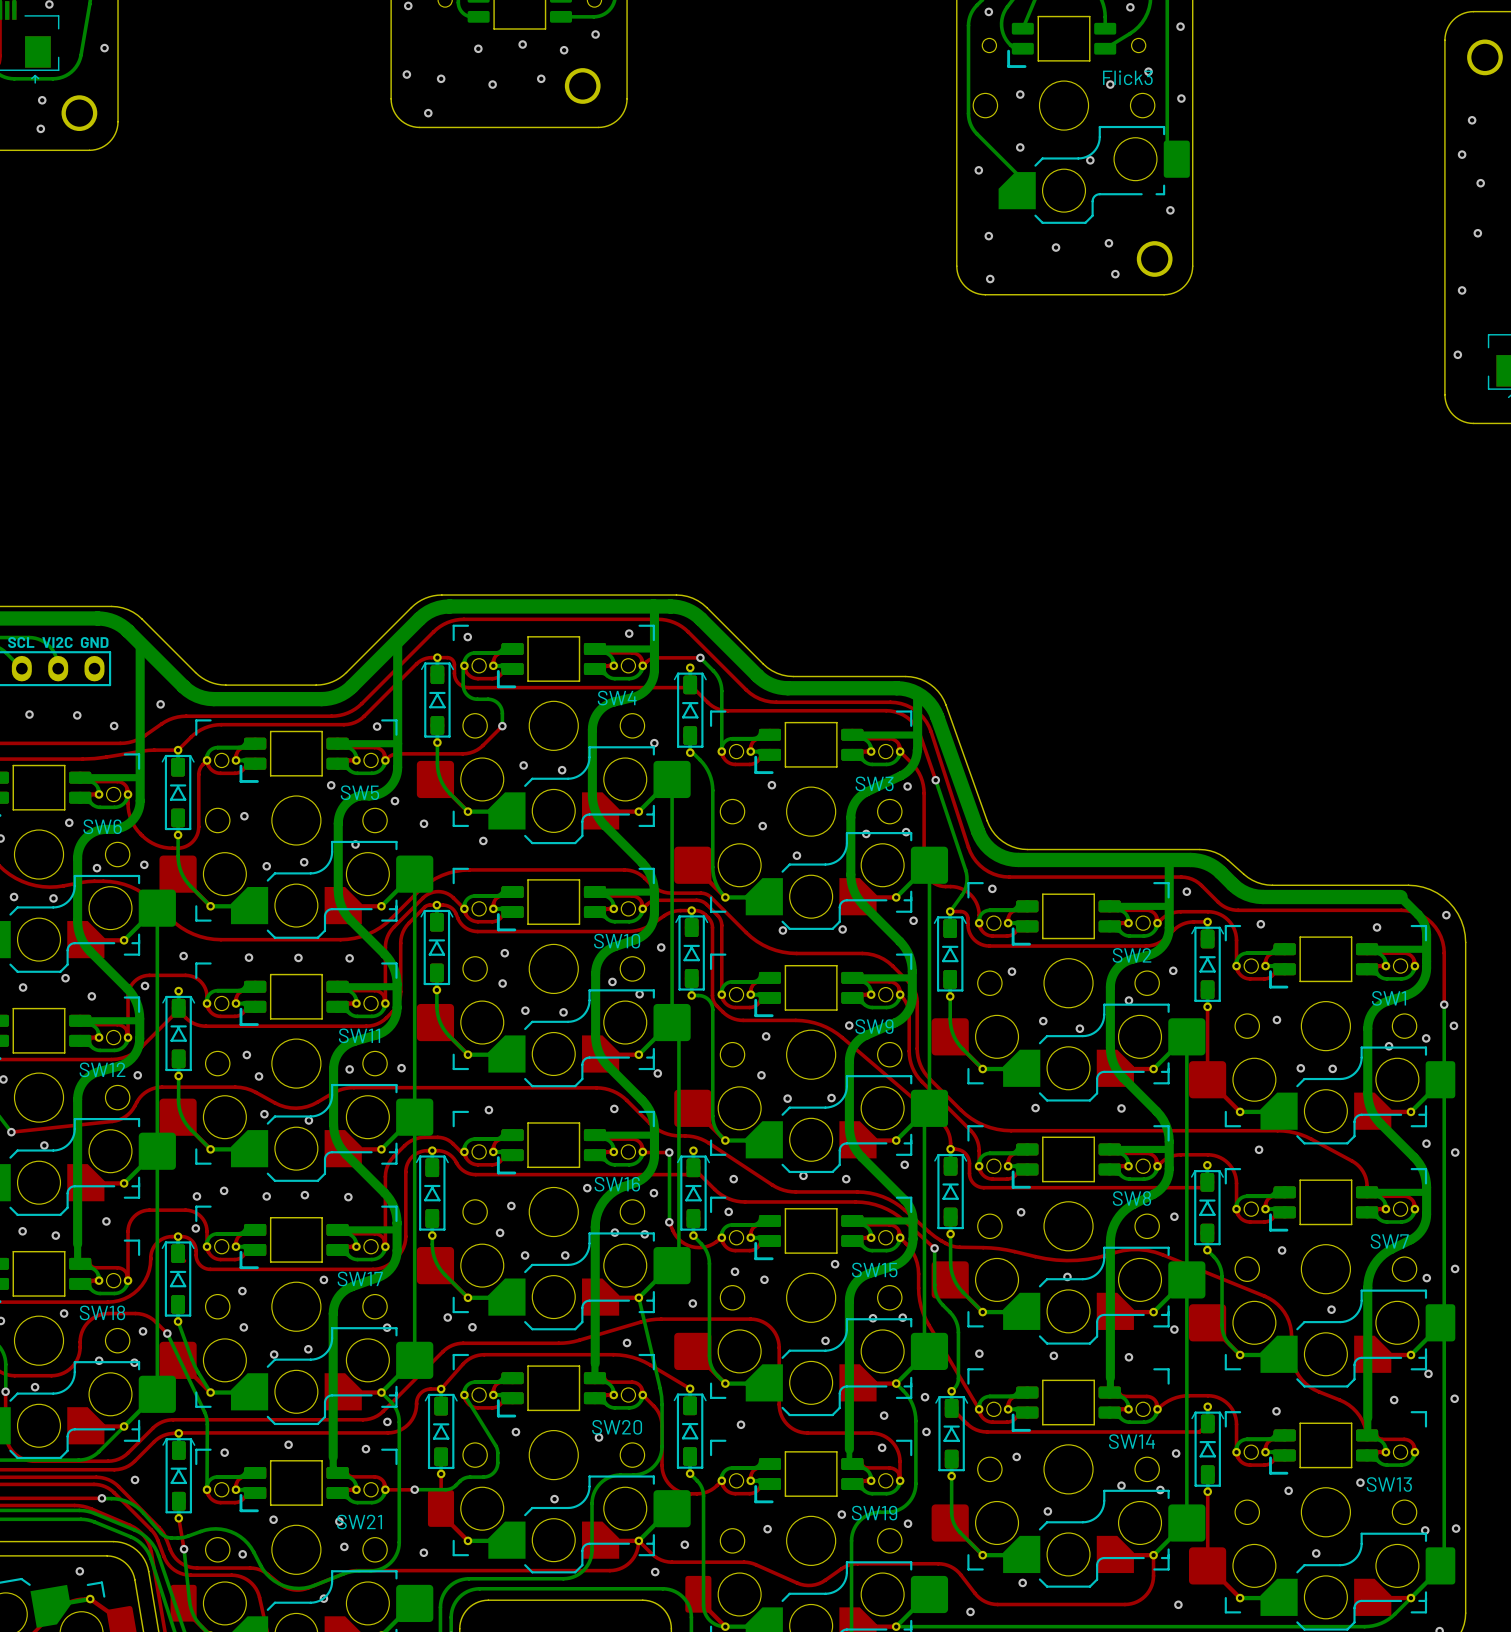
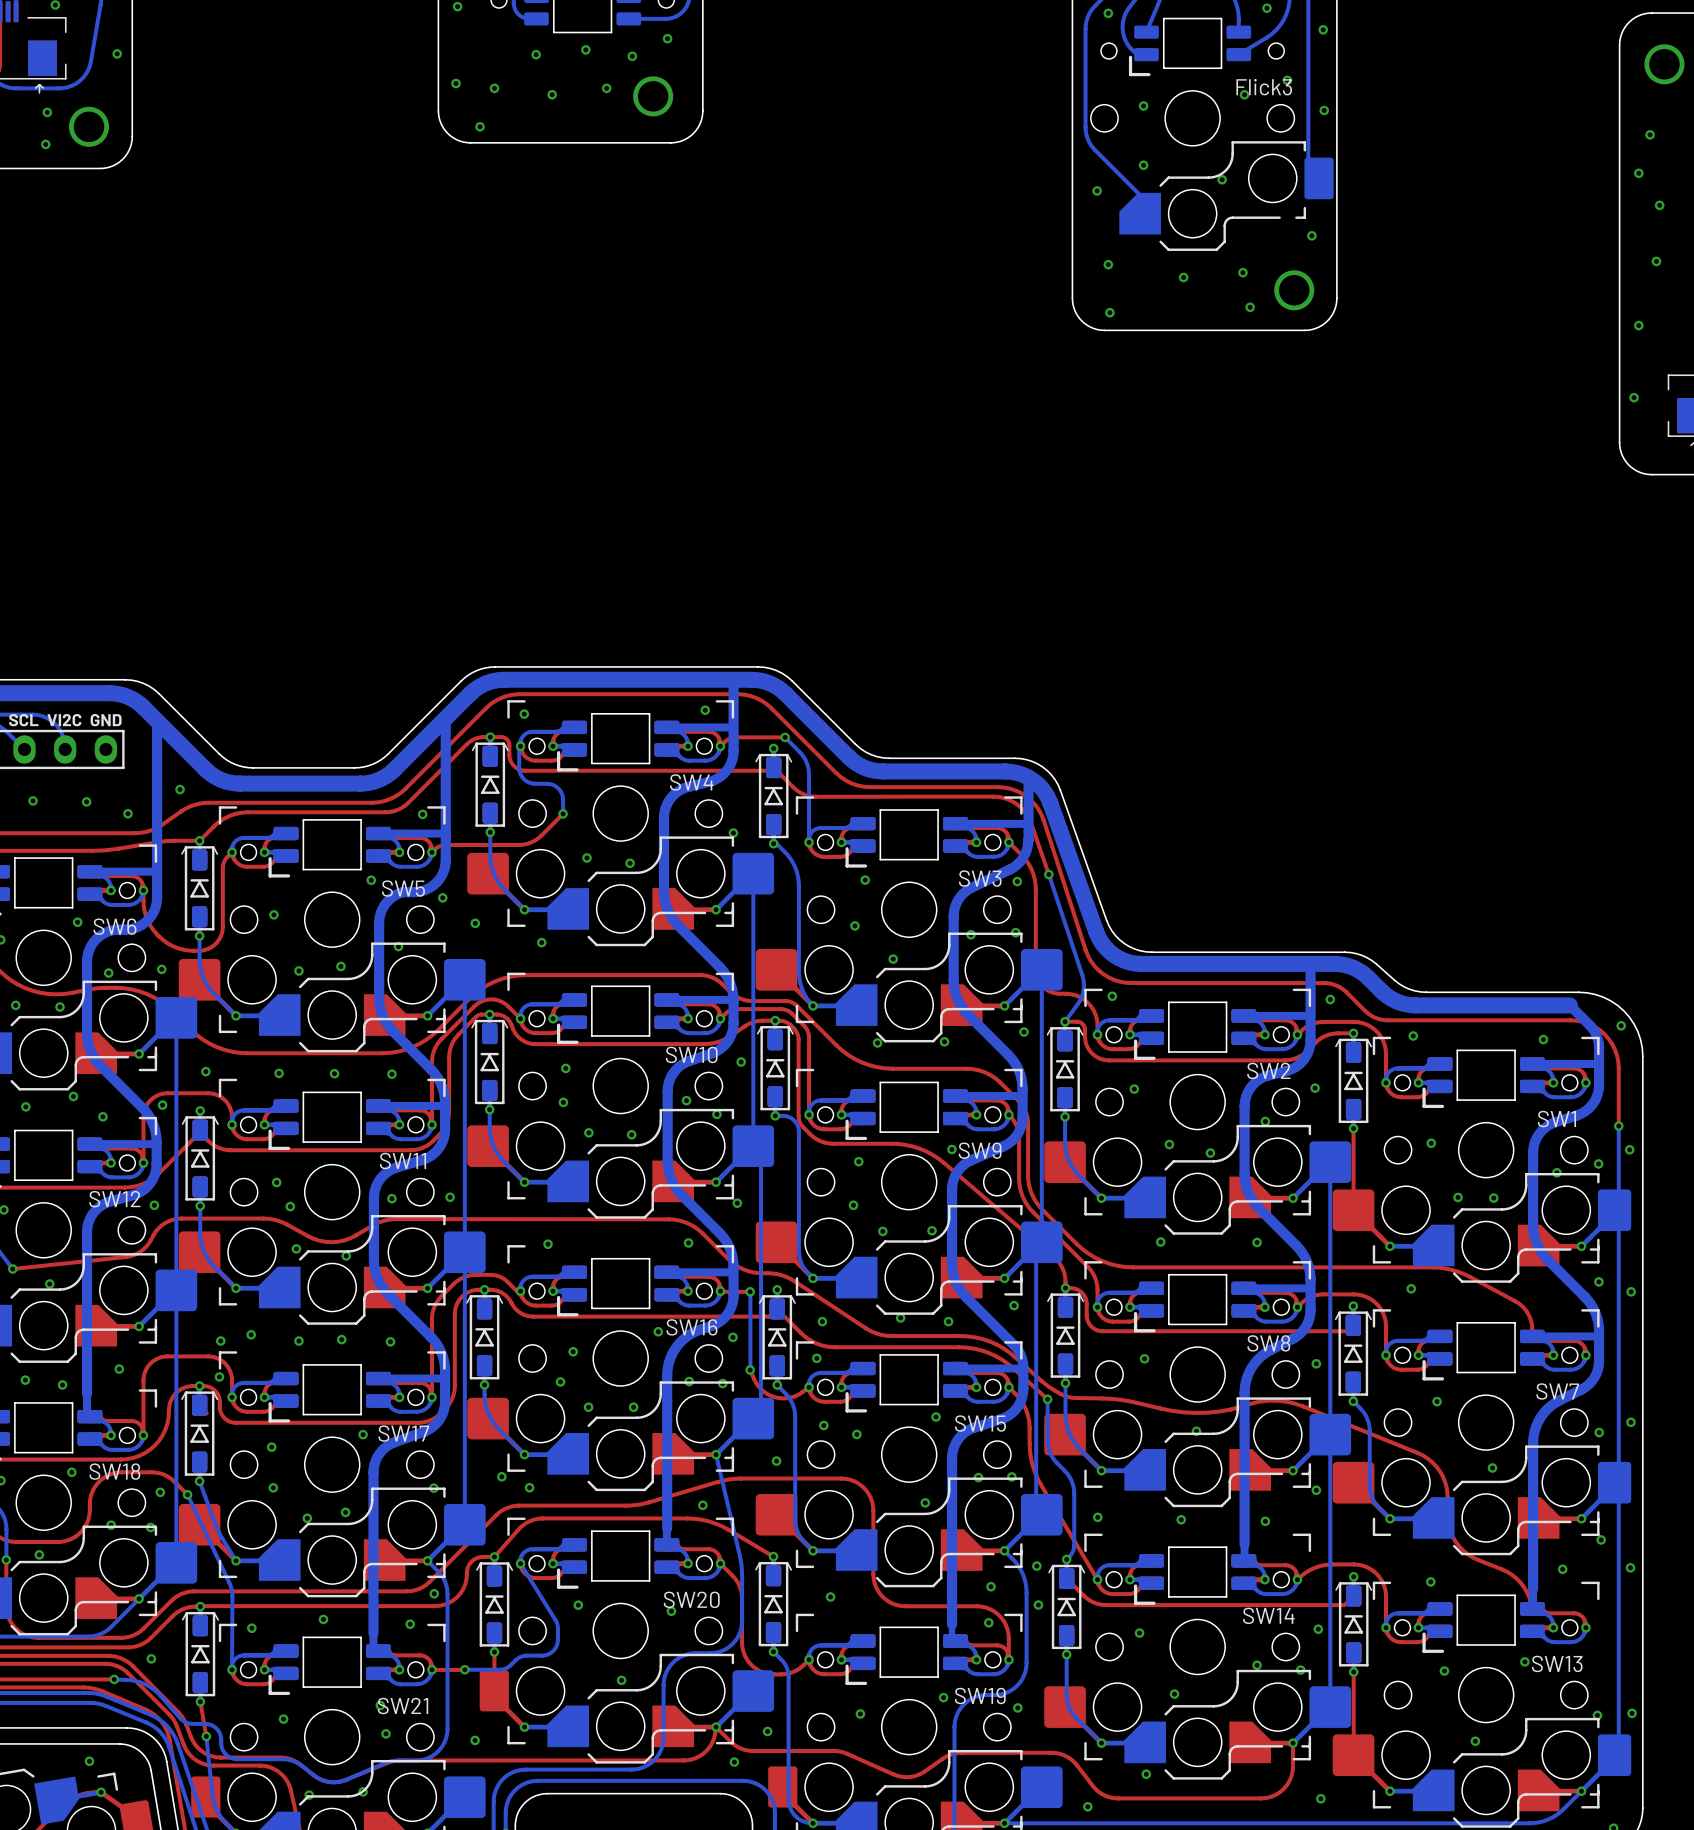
via: (273, 1519) -> none
via: none -> (283, 1719)
bottom track: (177, 1538) (210, 1529) (231, 1531) (247, 1543) (263, 1569) (270, 1577) (288, 1587) (309, 1587) (347, 1572) (359, 1570) -> (199, 1723) (208, 1724) (216, 1728) (220, 1734) (222, 1750) (230, 1757) (289, 1759) (326, 1781) (343, 1780) (387, 1762) (402, 1760)
via: (242, 1554) -> none
via: none -> (309, 1795)

